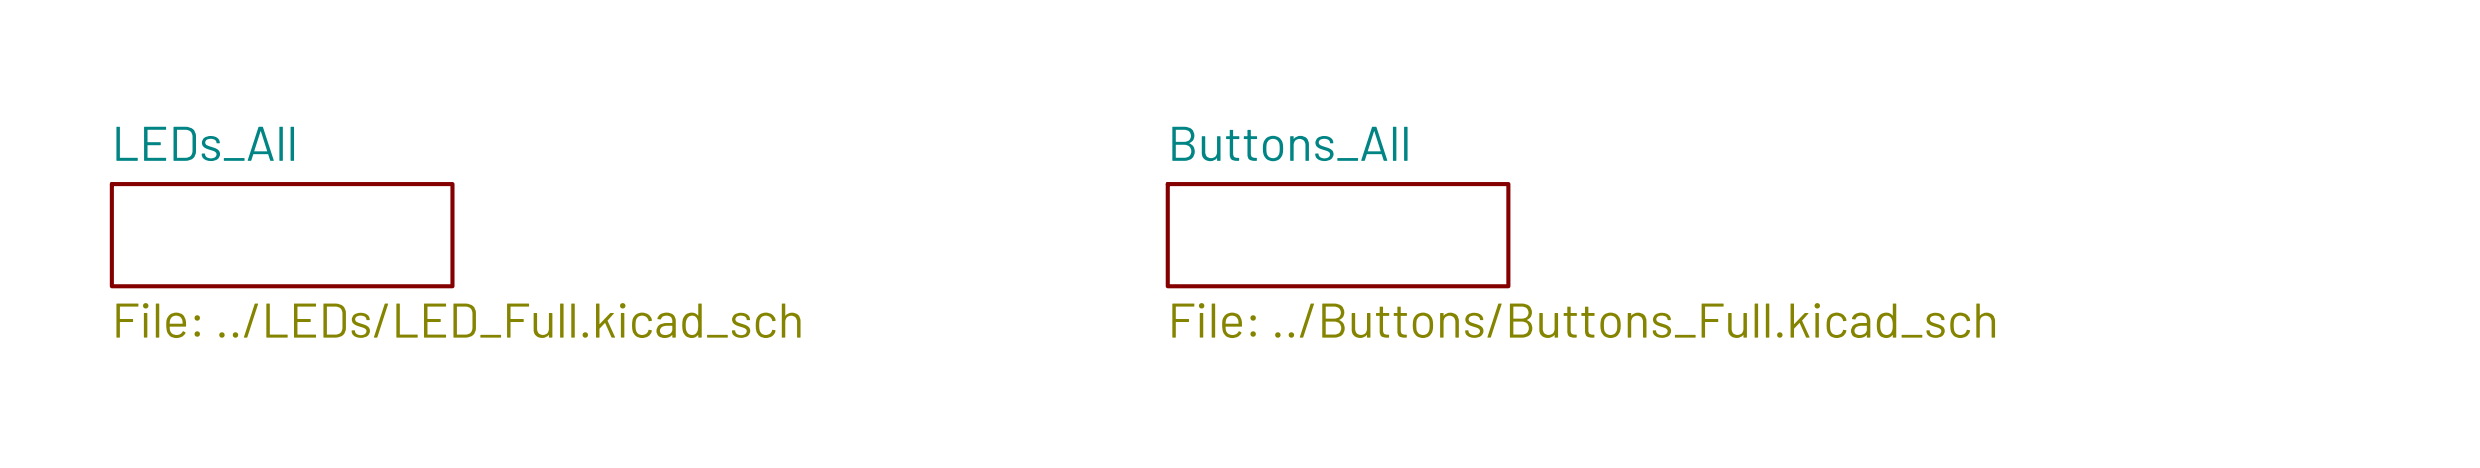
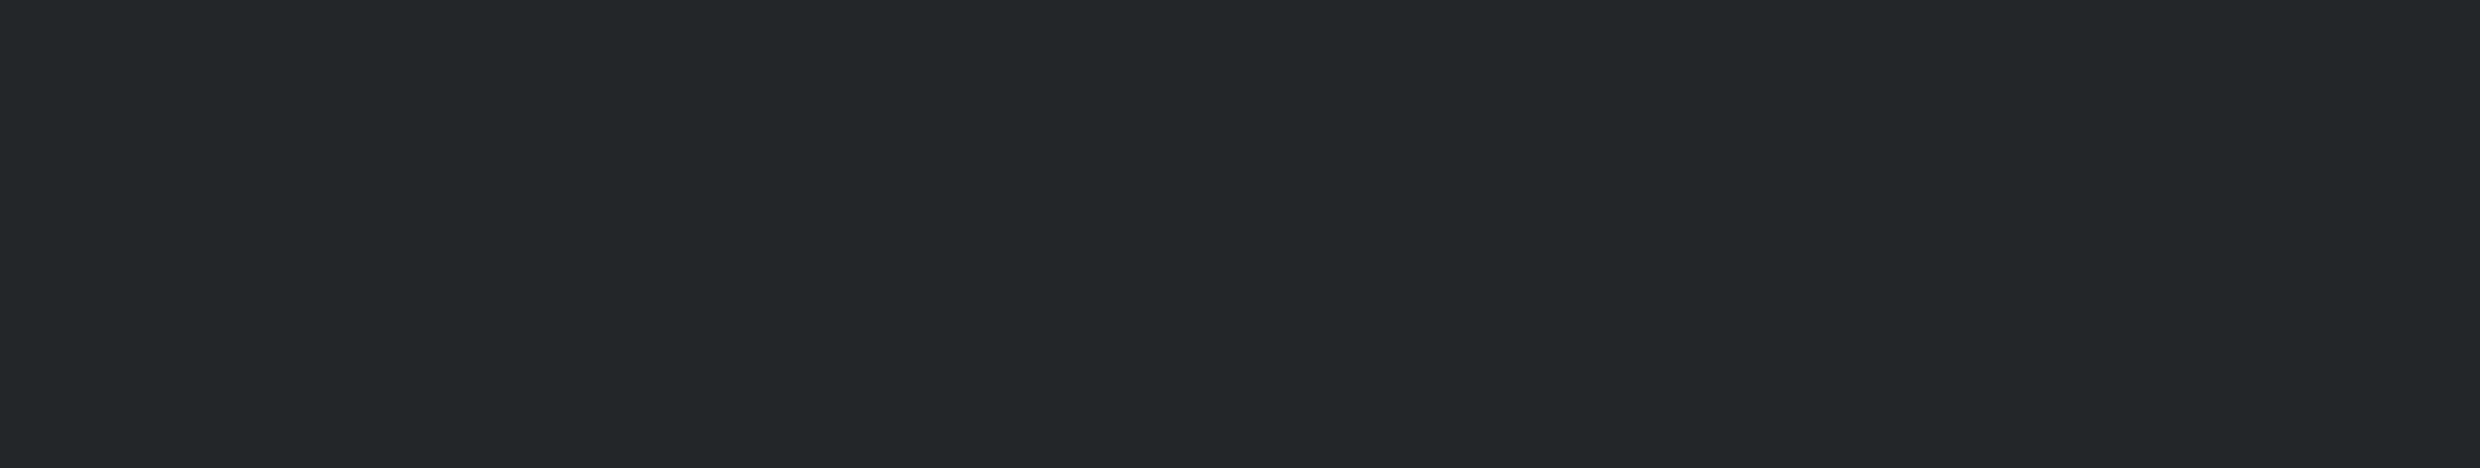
sheet LEDs_All: File: ../LEDs/LED_Full.kicad_sch (282, 235) -> none
sheet Buttons_All: File: ../Buttons/Buttons_Full.kicad_sch (1338, 235) -> none

